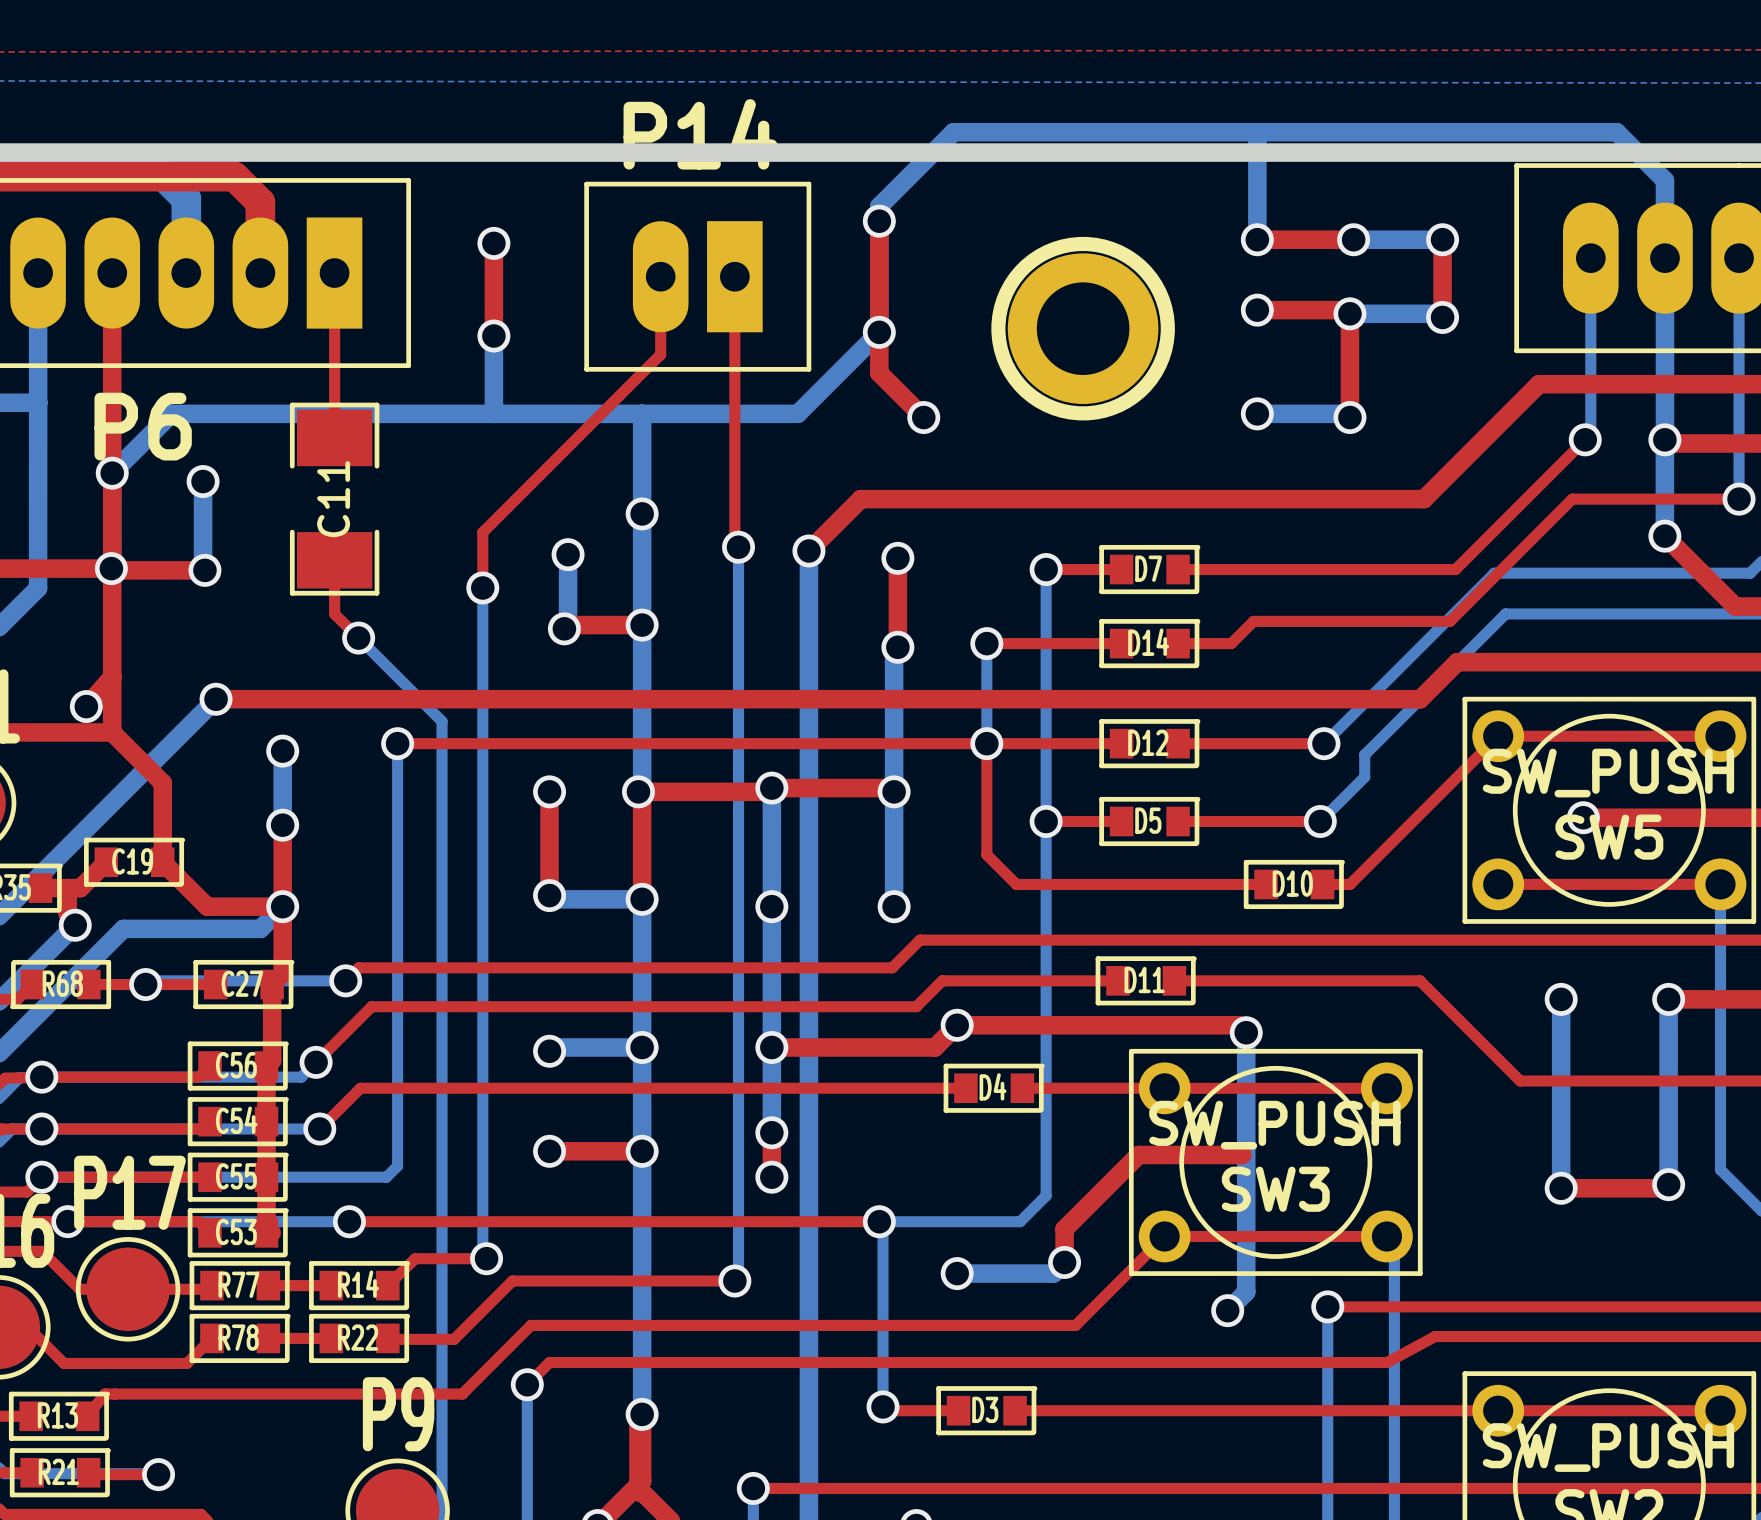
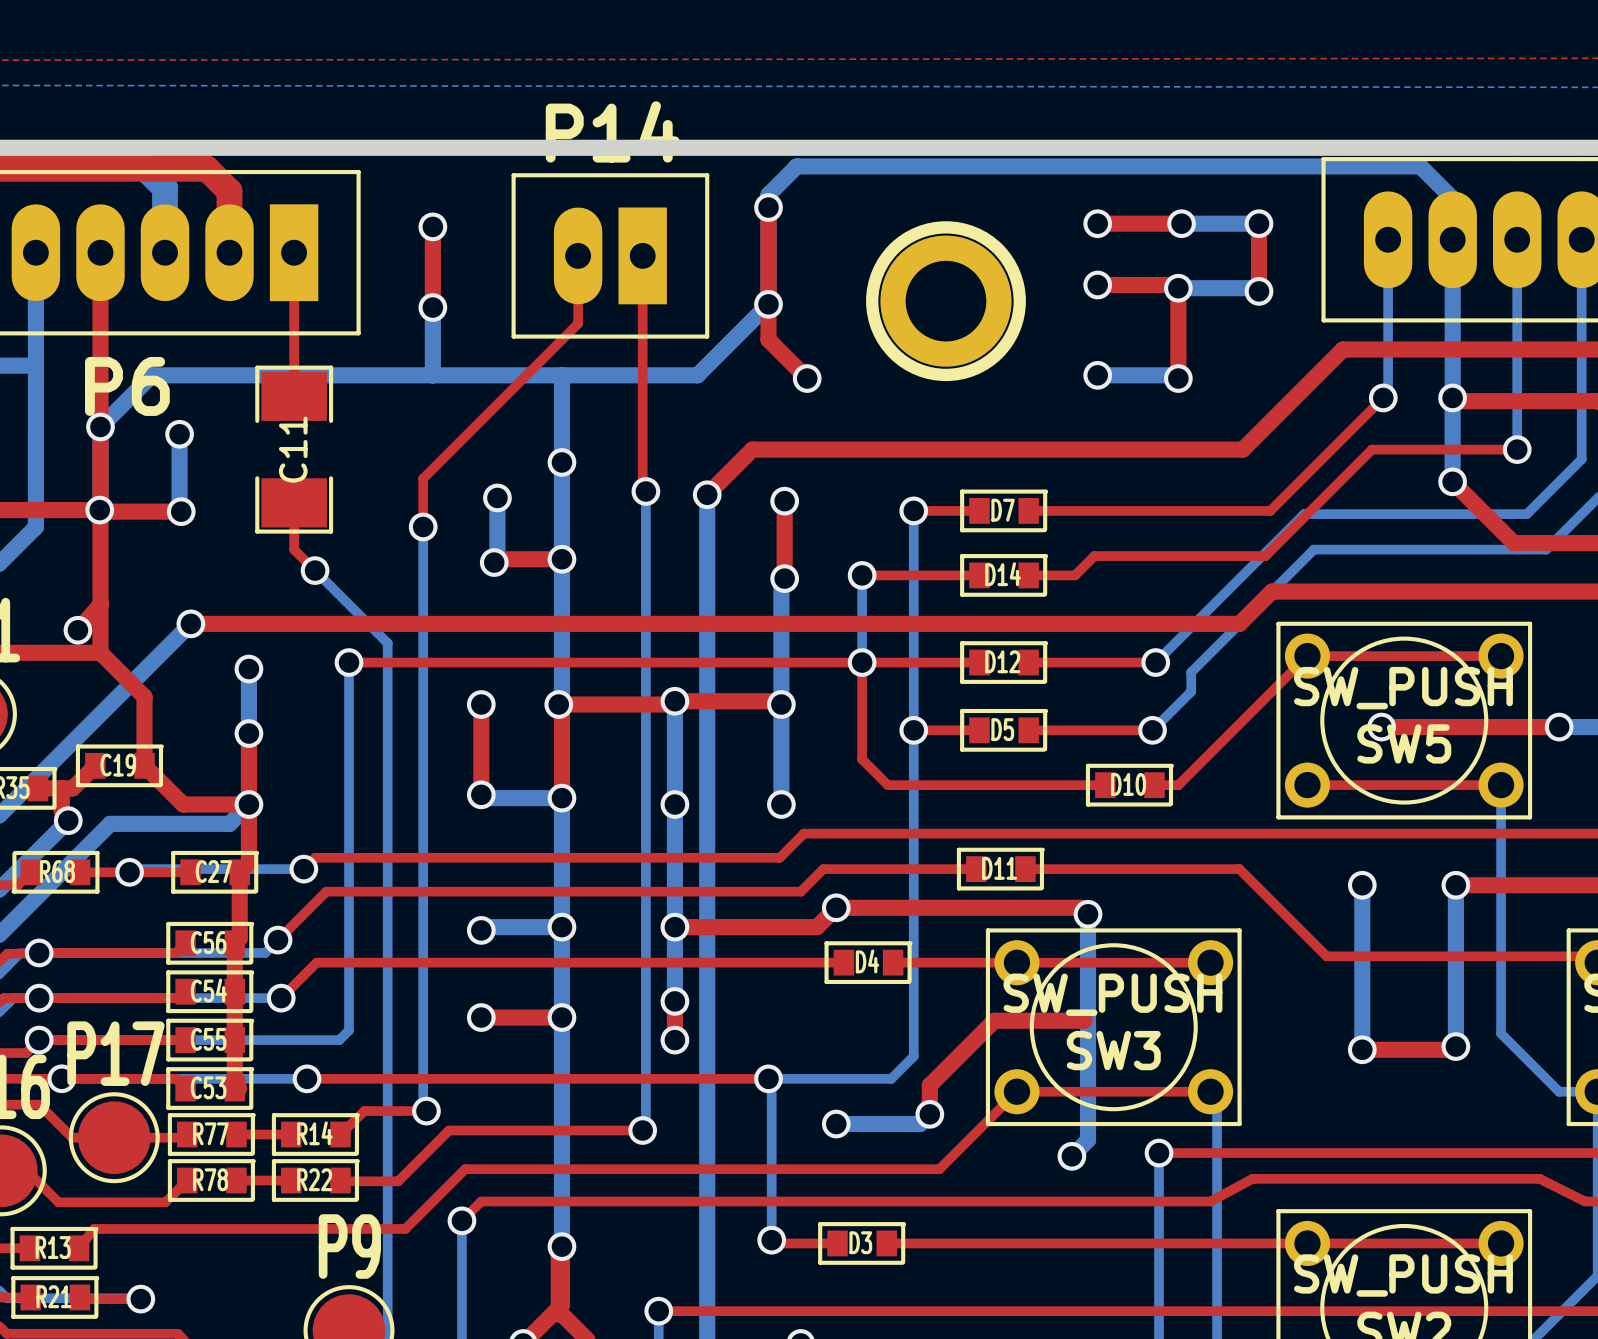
bottom track: (1257, 132) (1257, 239) -> none
bottom track: (911, 173) (953, 132) (1616, 132) (1664, 180) (1664, 211) -> (796, 166) (1420, 166) (1452, 198)

